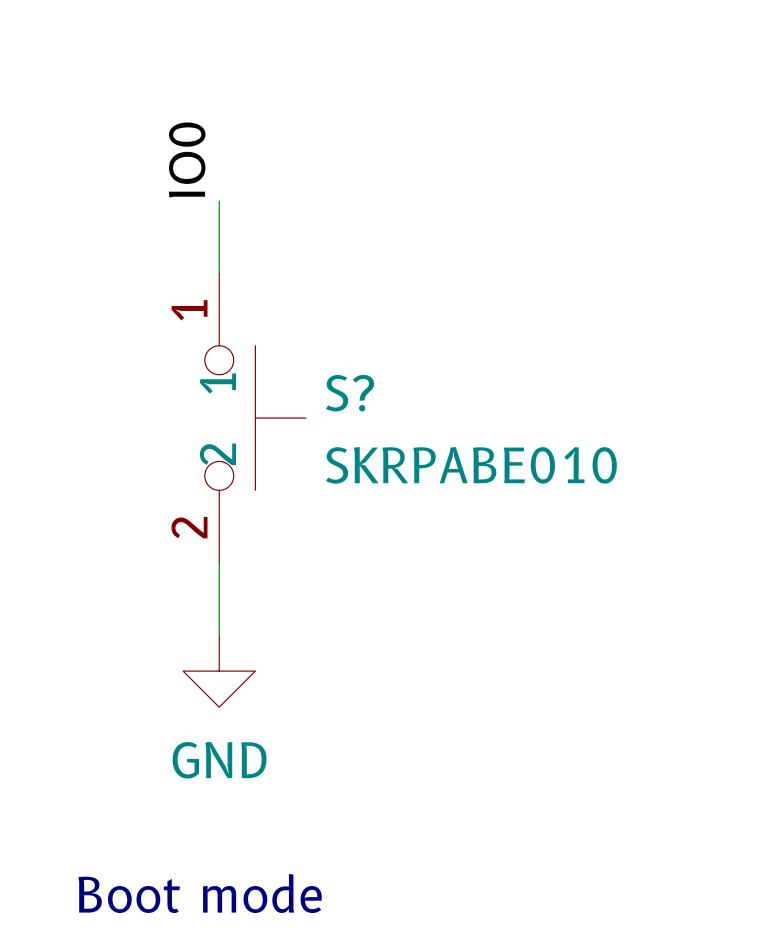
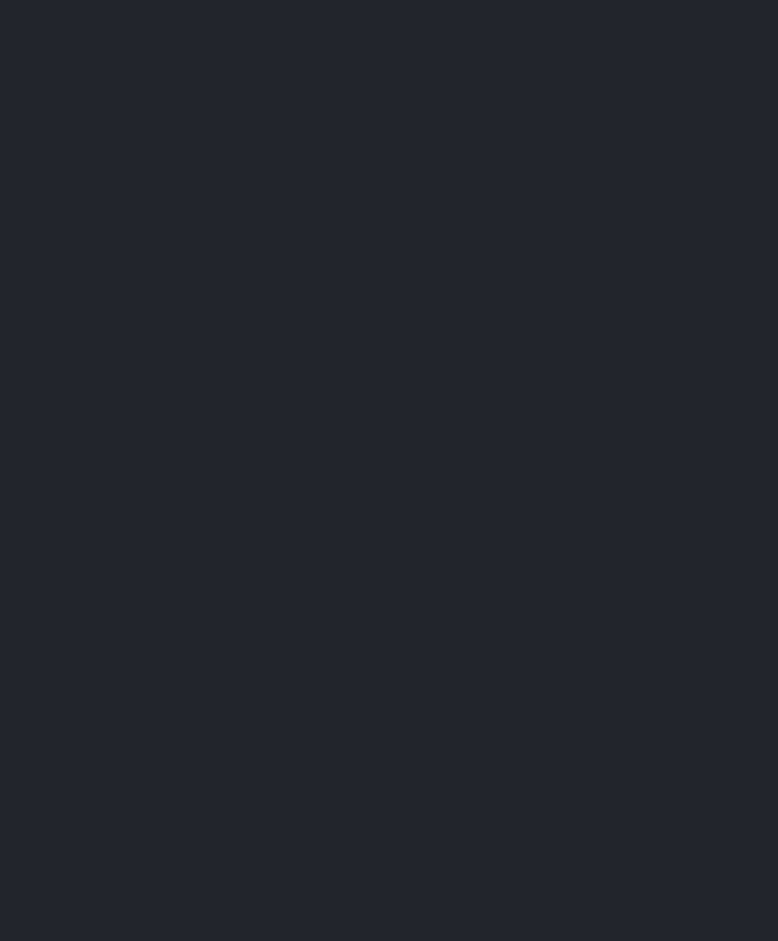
label: IO0 (187, 159) -> none
wire: (219, 201) (219, 273) -> none
S?: SKRPABE010 (255, 418) -> none
wire: (219, 562) (219, 634) -> none
power symbol: GND (219, 671) -> none
text: Boot mode (200, 893) -> none

